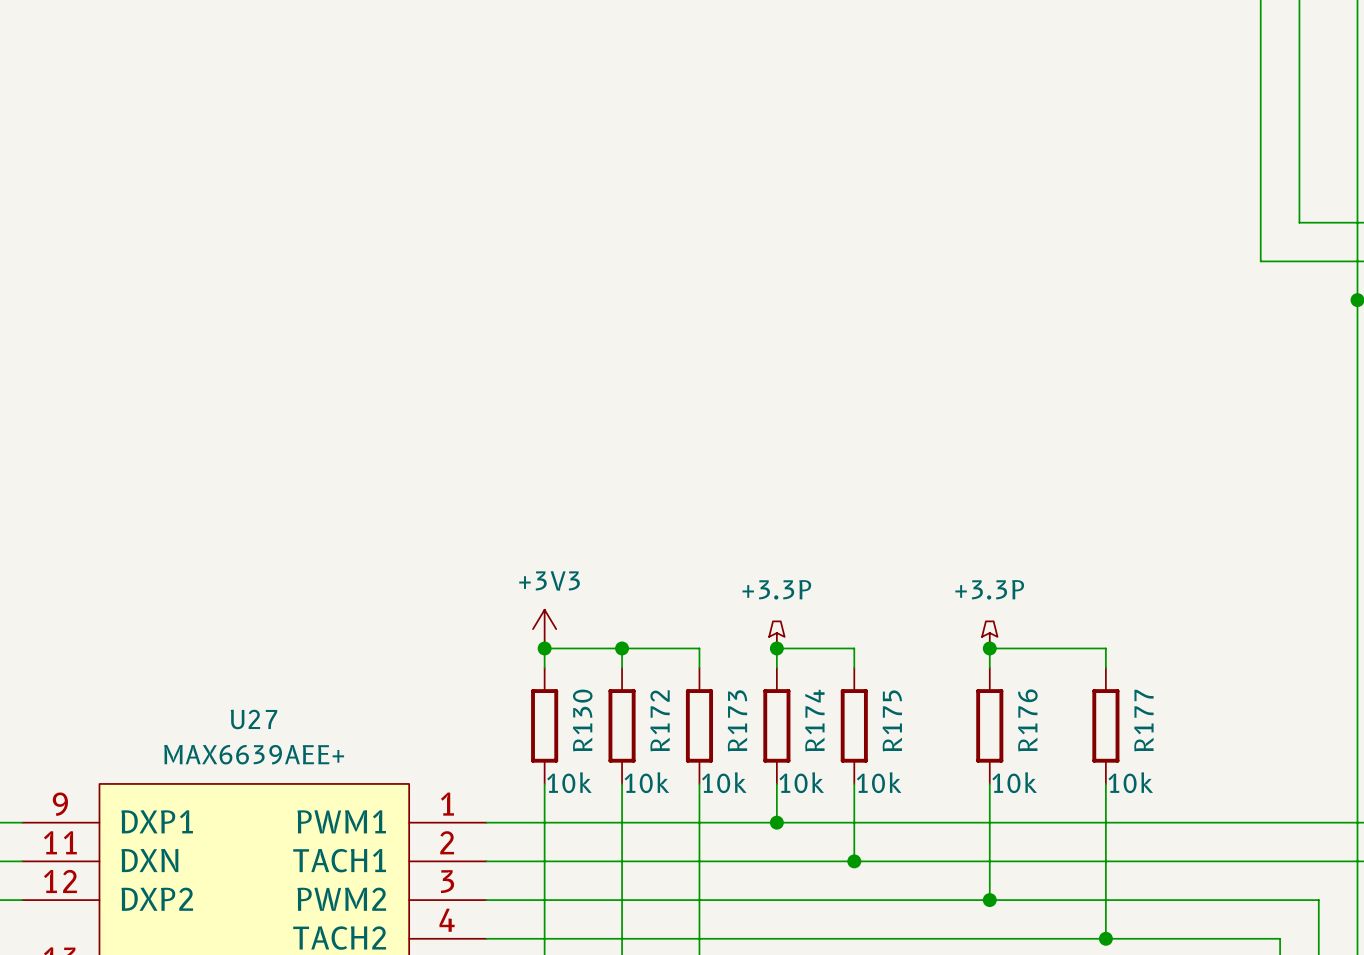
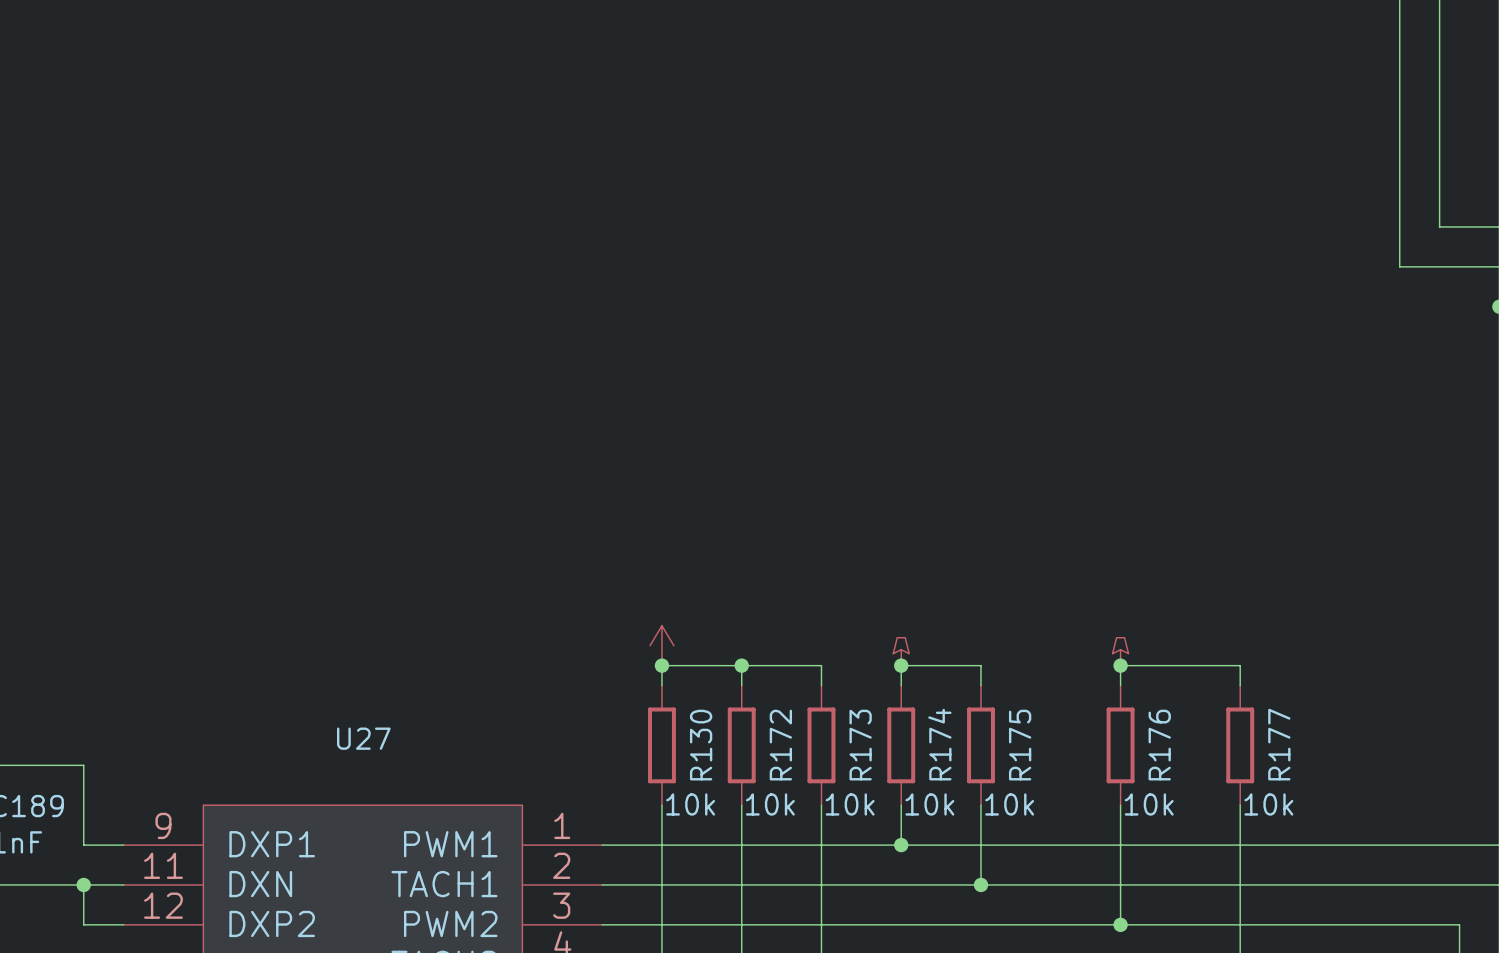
power symbol text: +3V3 (549, 580) -> none
power symbol text: +3.3P (776, 589) -> none
power symbol text: +3.3P (989, 589) -> none
U27 value: MAX6639AEE+ (254, 754) -> none

